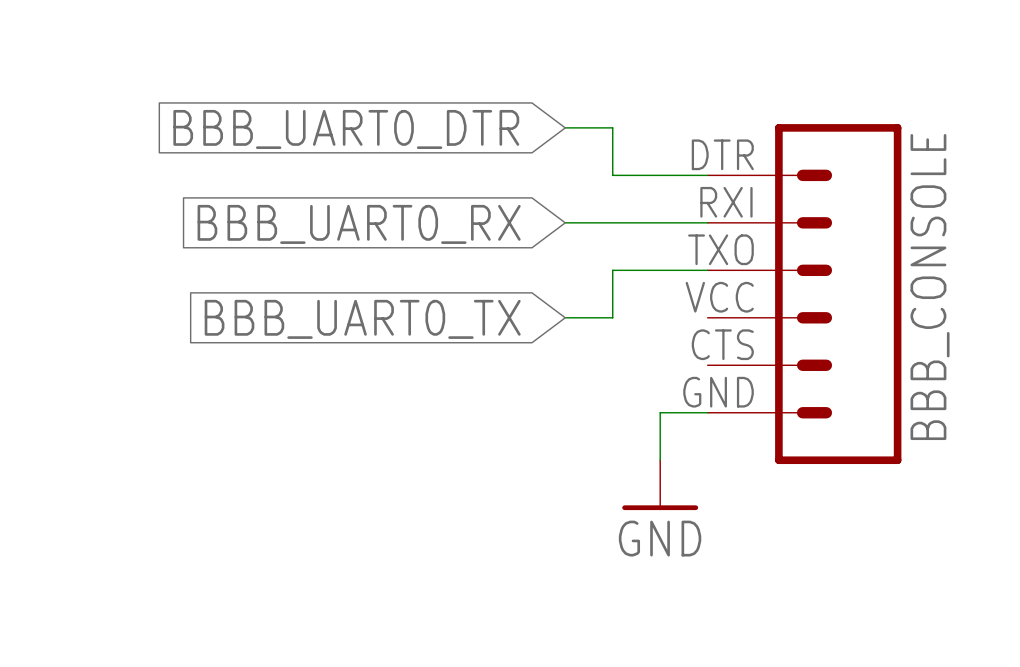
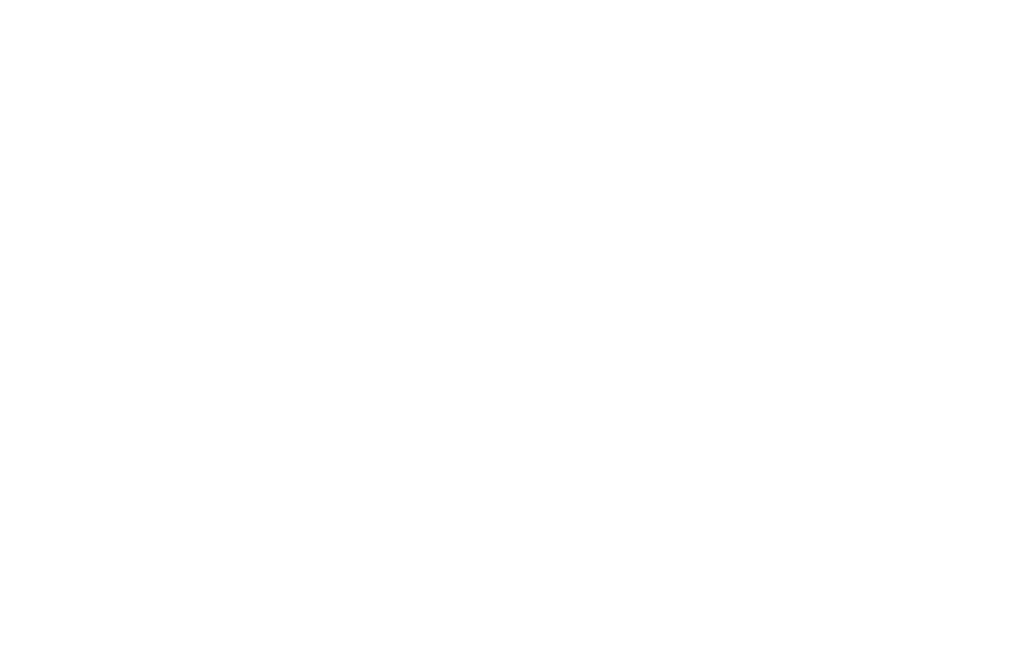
wire: (565, 127) (612, 127) (612, 175) (707, 175) -> none
global label: BBB_UART0_DTR (346, 129) -> none
wire: (565, 222) (707, 222) -> none
global label: BBB_UART0_RX (359, 224) -> none
wire: (707, 270) (612, 270) (612, 317) (565, 317) -> none
BBB_CONSOLE: (804, 294) -> none
global label: BBB_UART0_TX (362, 319) -> none
wire: (707, 412) (660, 412) (660, 460) -> none
power symbol: GND (660, 485) -> none

